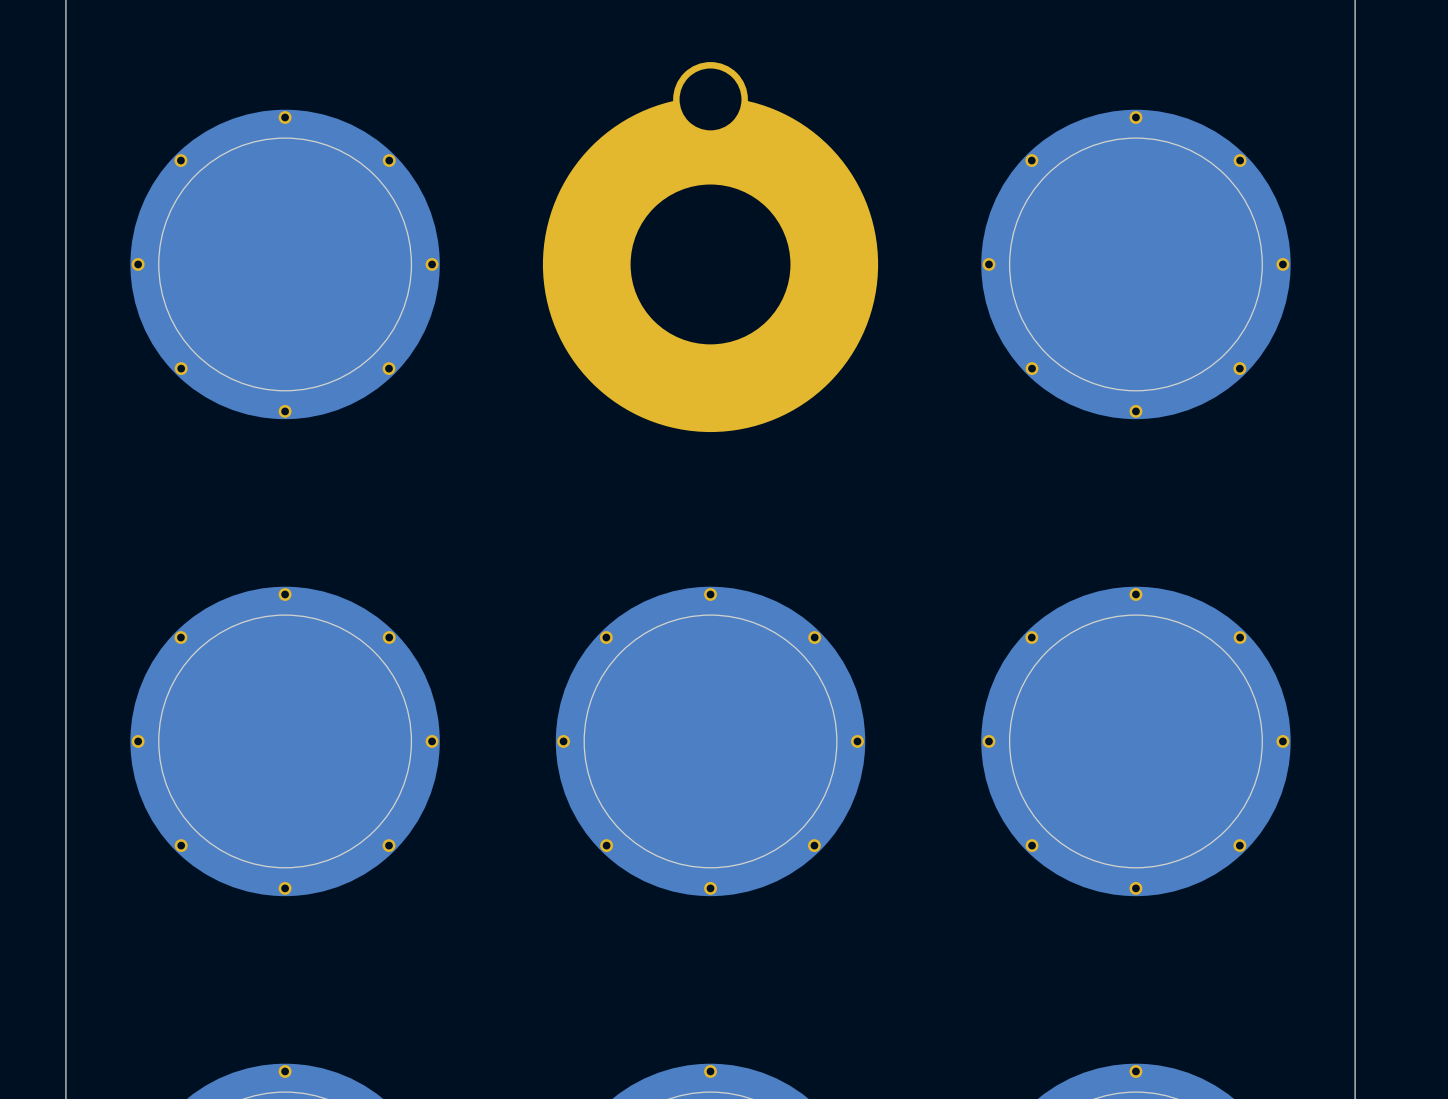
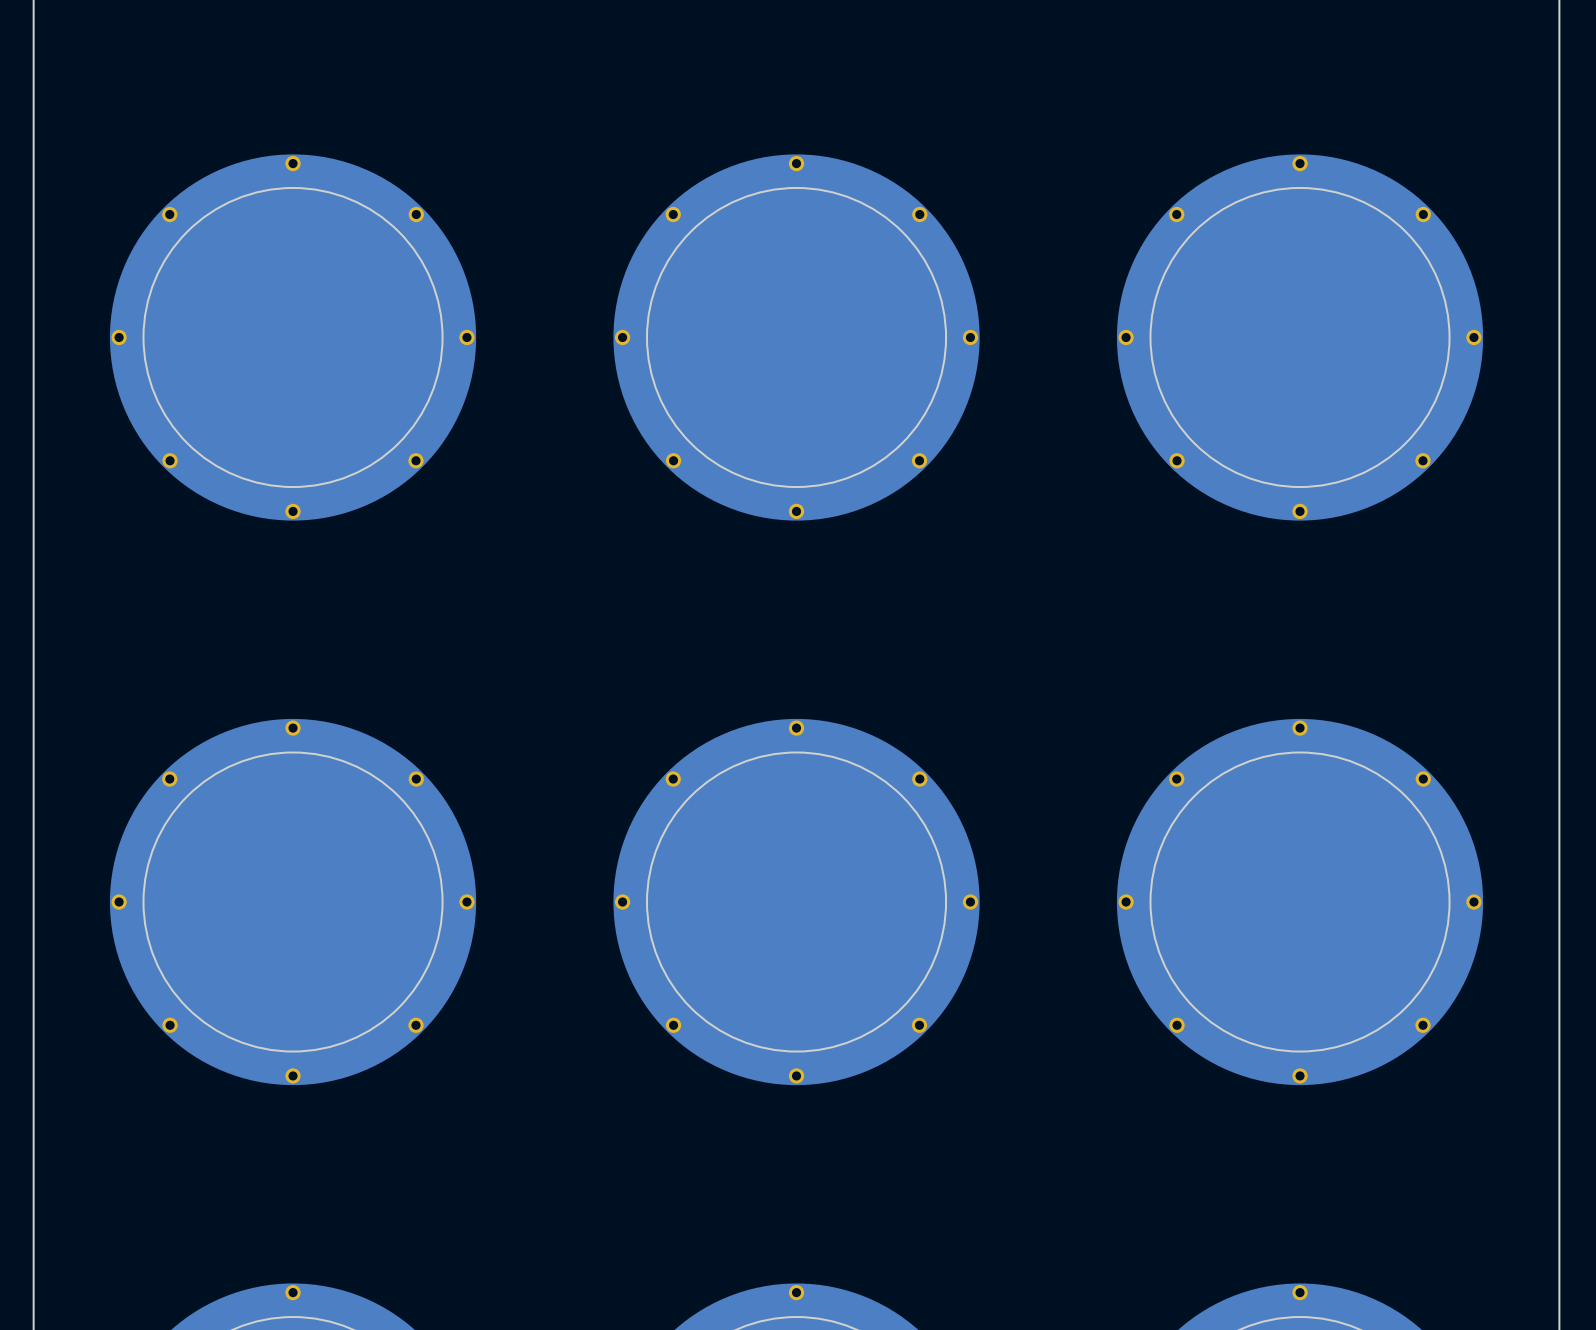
part footprint: [542, 62, 879, 433] -> [613, 154, 980, 521]

